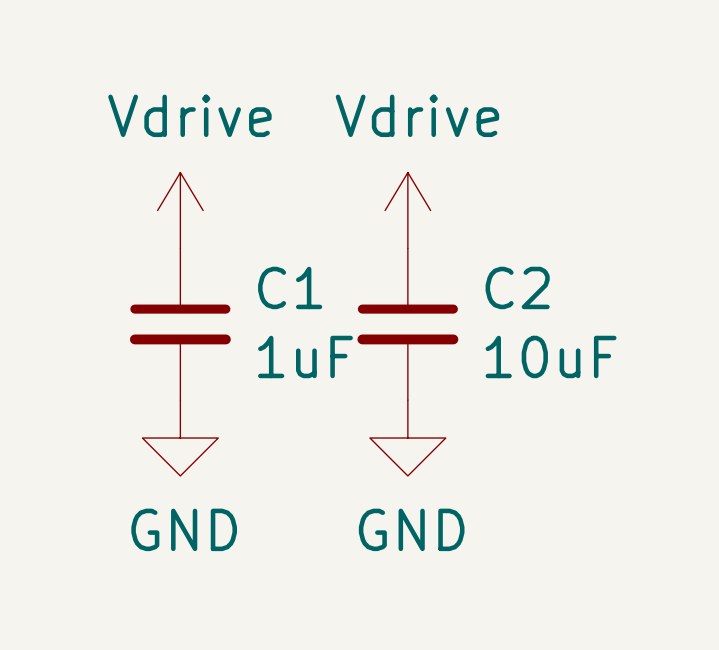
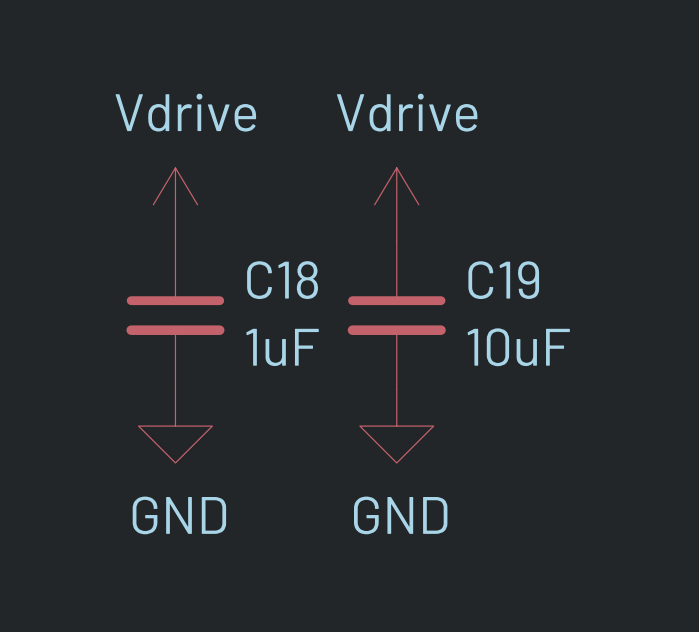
C1 name: C1 (290, 287) -> C18 (282, 280)
C2 name: C2 (517, 287) -> C19 (503, 280)

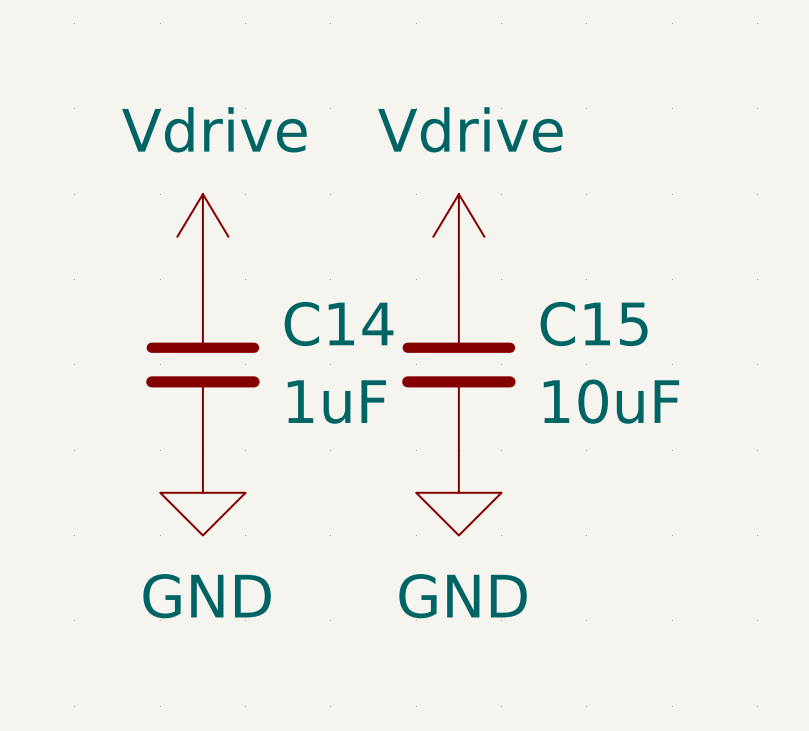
C18 name: C18 (282, 280) -> C14 (339, 324)
C19 name: C19 (503, 280) -> C15 (594, 324)

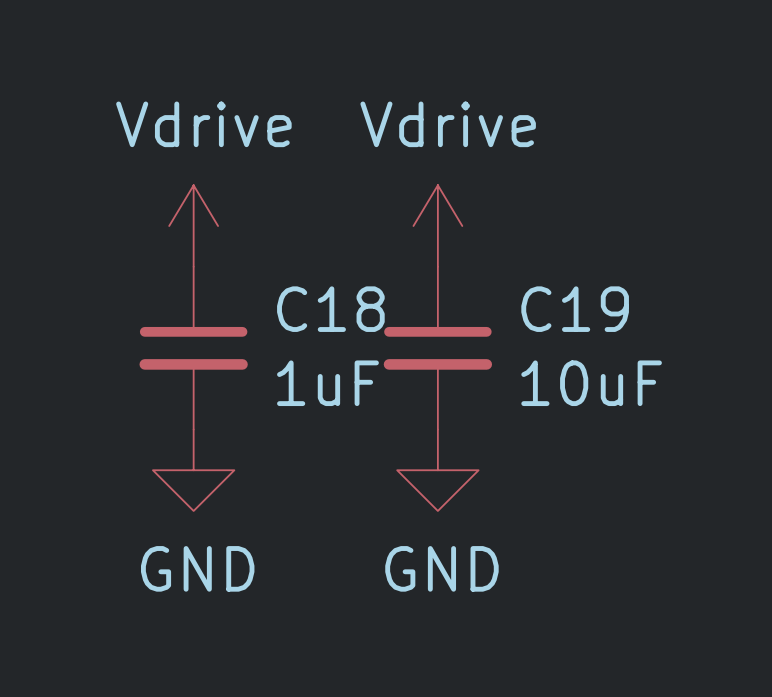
C14 name: C14 (339, 324) -> C18 (330, 309)
C15 name: C15 (594, 324) -> C19 (575, 309)

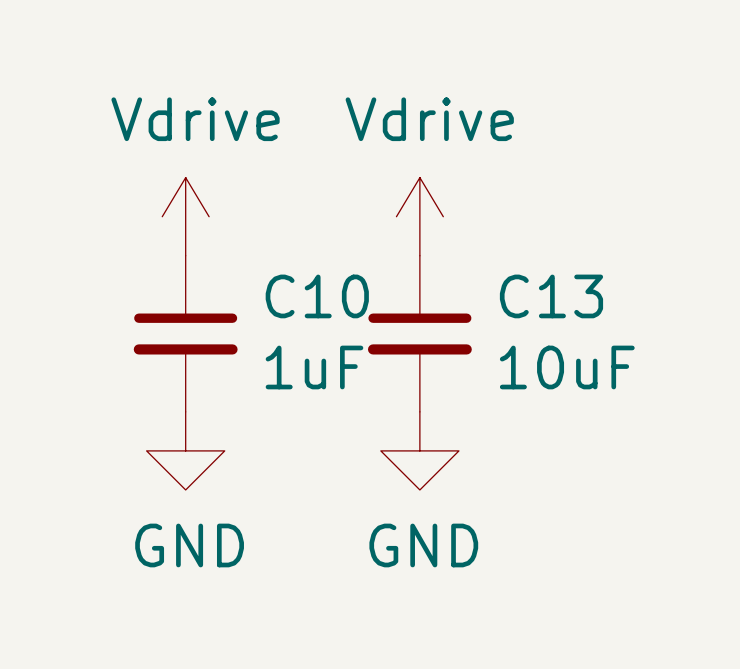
C18 name: C18 (330, 309) -> C10 (317, 296)
C19 name: C19 (575, 309) -> C13 (551, 296)

